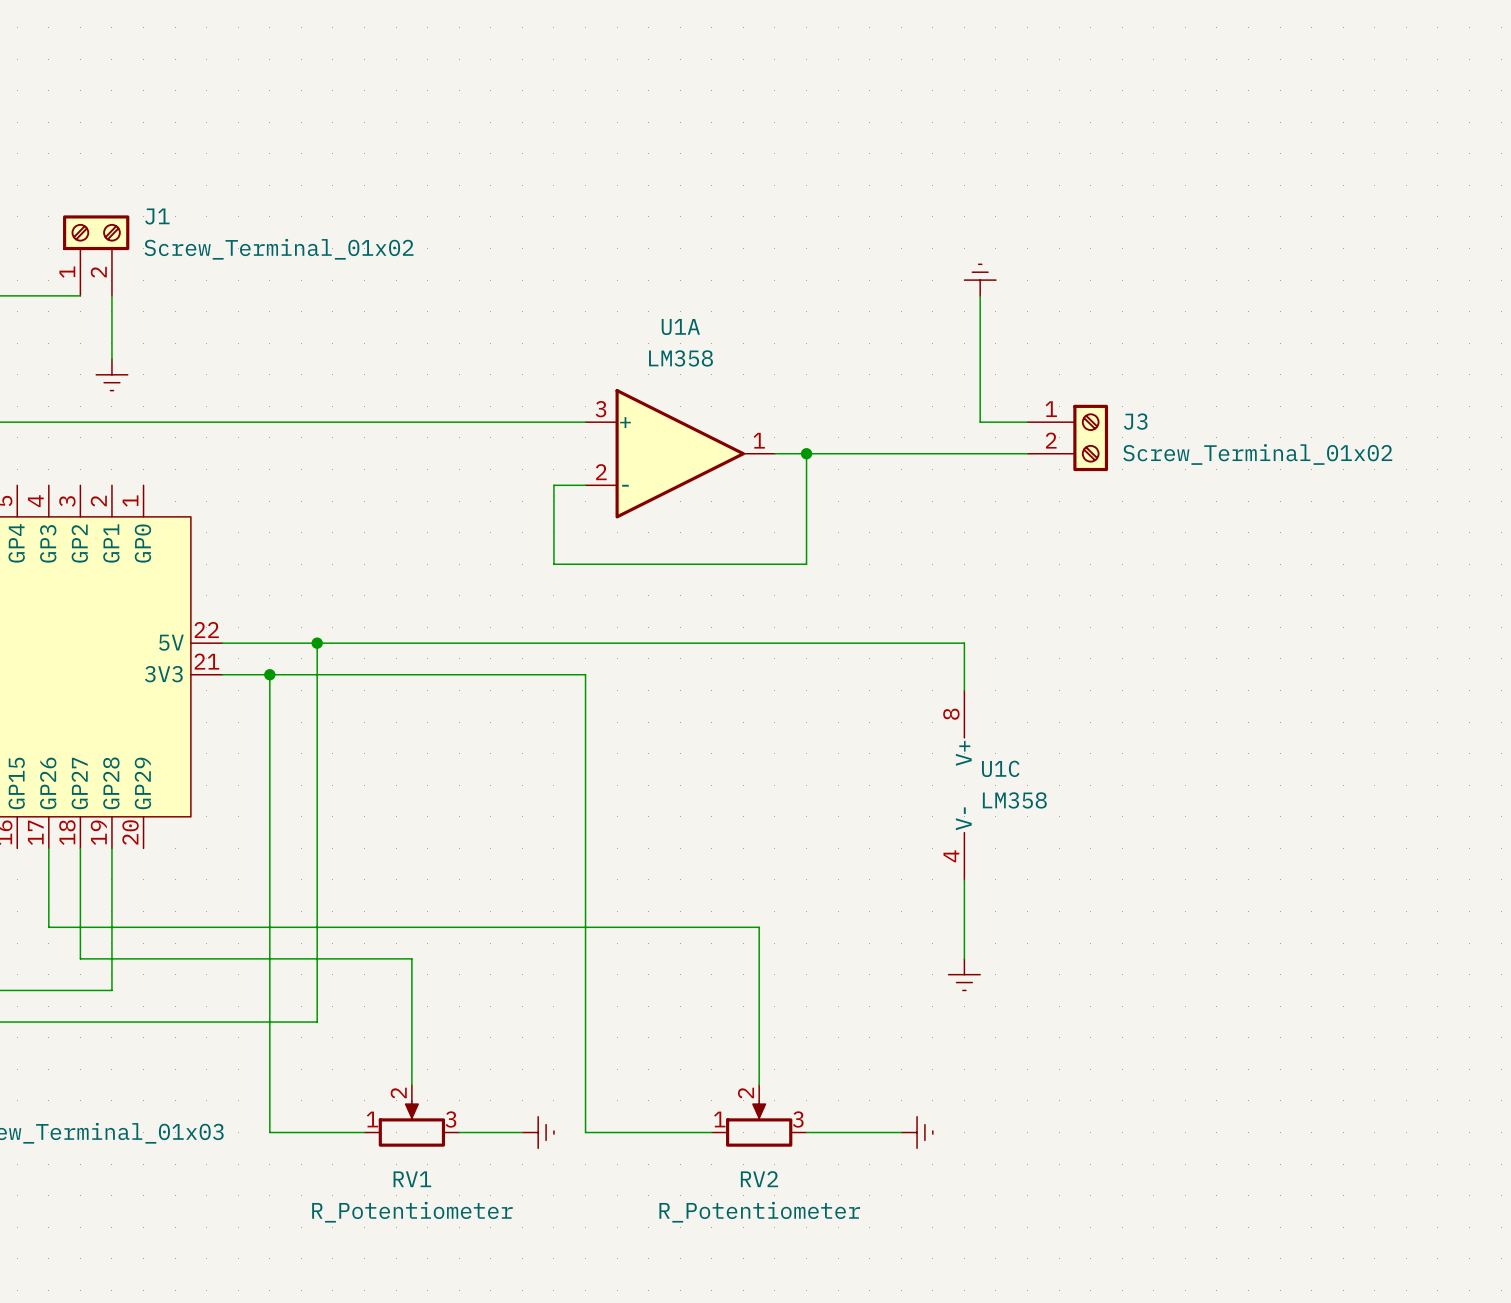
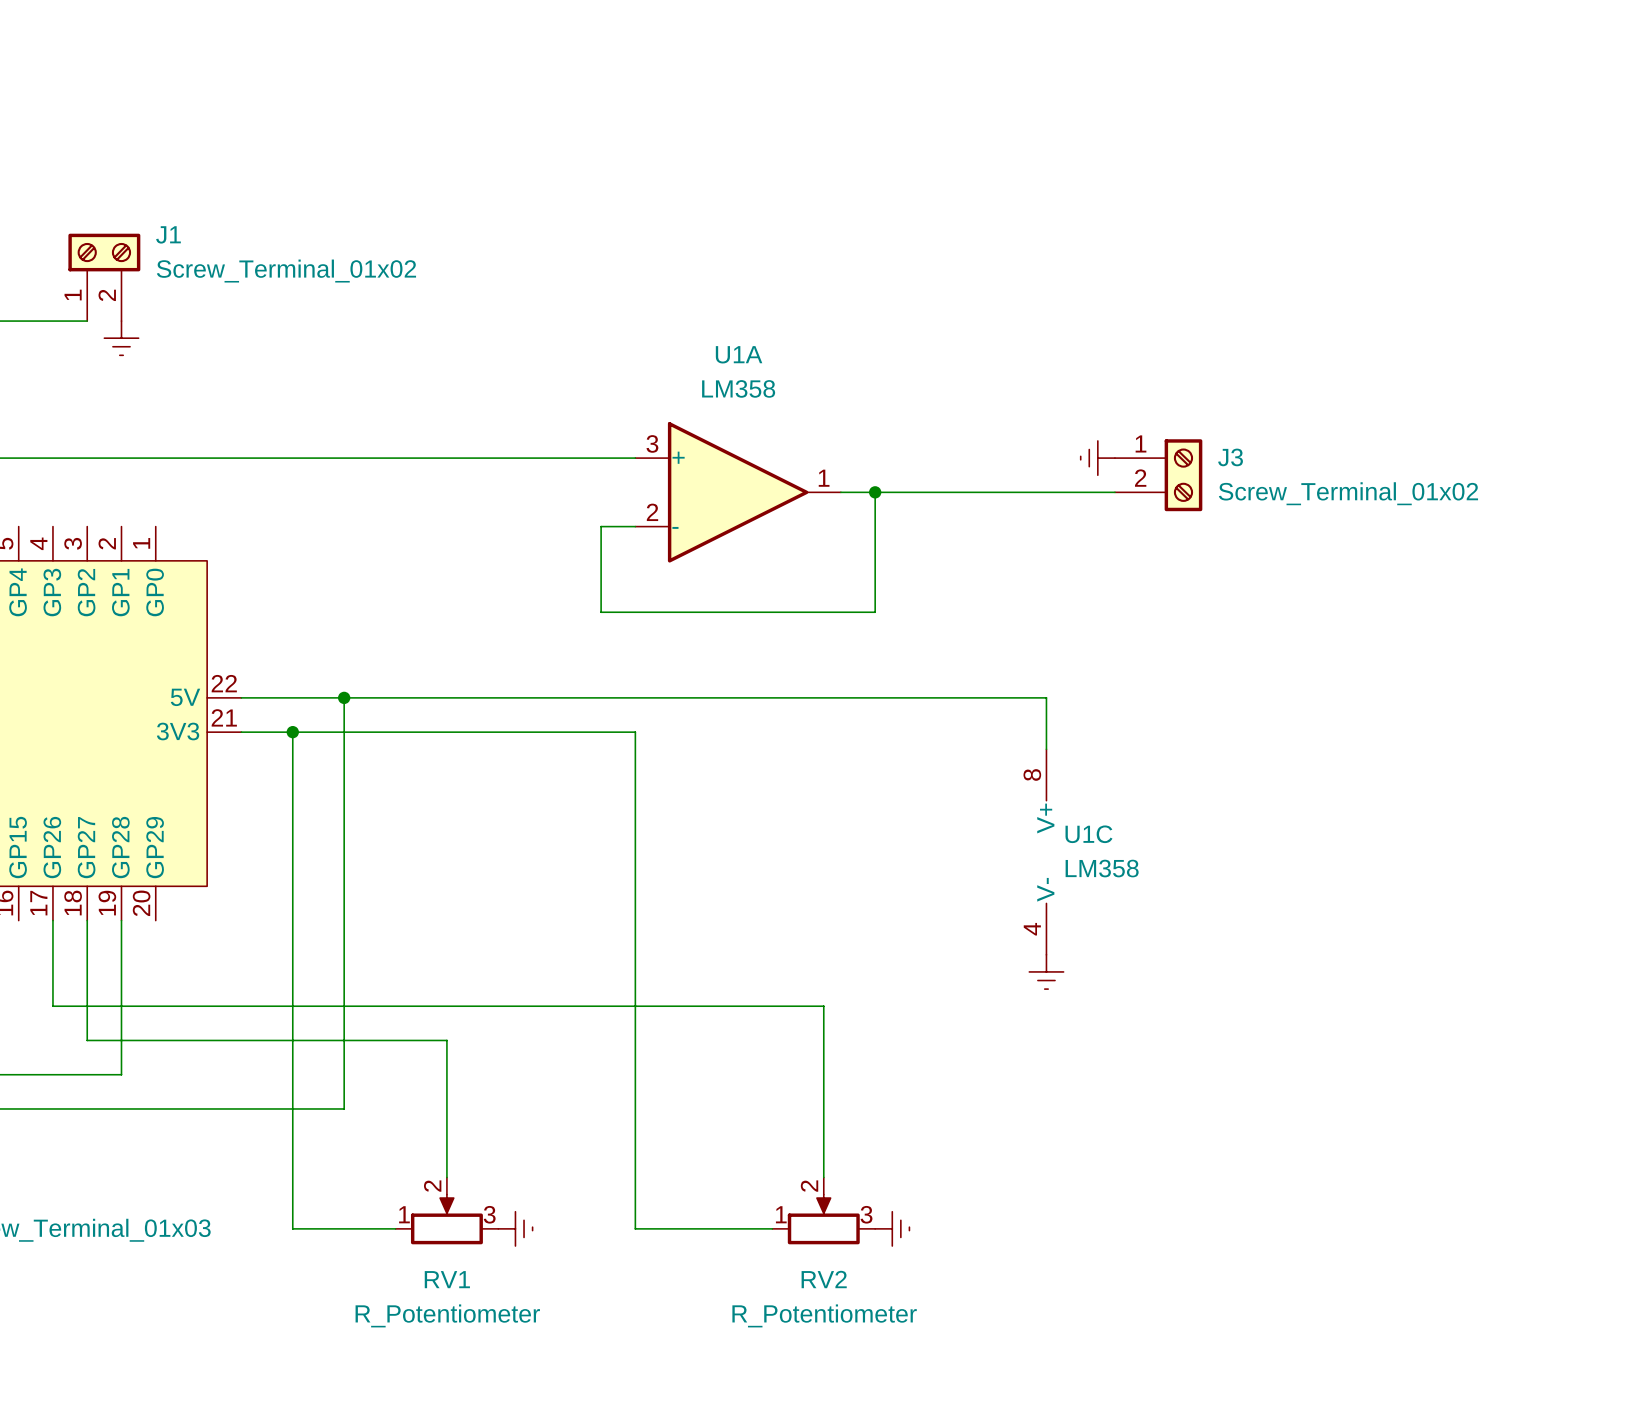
power symbol rotation: 0° (980, 280) -> 90° counterclockwise (1097, 458)
power symbol position: (980, 280) -> (1097, 458)
wire: (111, 295) (111, 359) -> none
wire: (980, 295) (980, 422) (1027, 422) -> none
power symbol position: (111, 374) -> (121, 338)
wire: (964, 879) (964, 958) -> none
power symbol position: (964, 974) -> (1046, 971)
wire: (459, 1132) (522, 1132) -> none
power symbol position: (538, 1132) -> (515, 1228)
wire: (806, 1132) (901, 1132) -> none
power symbol position: (917, 1132) -> (892, 1228)

